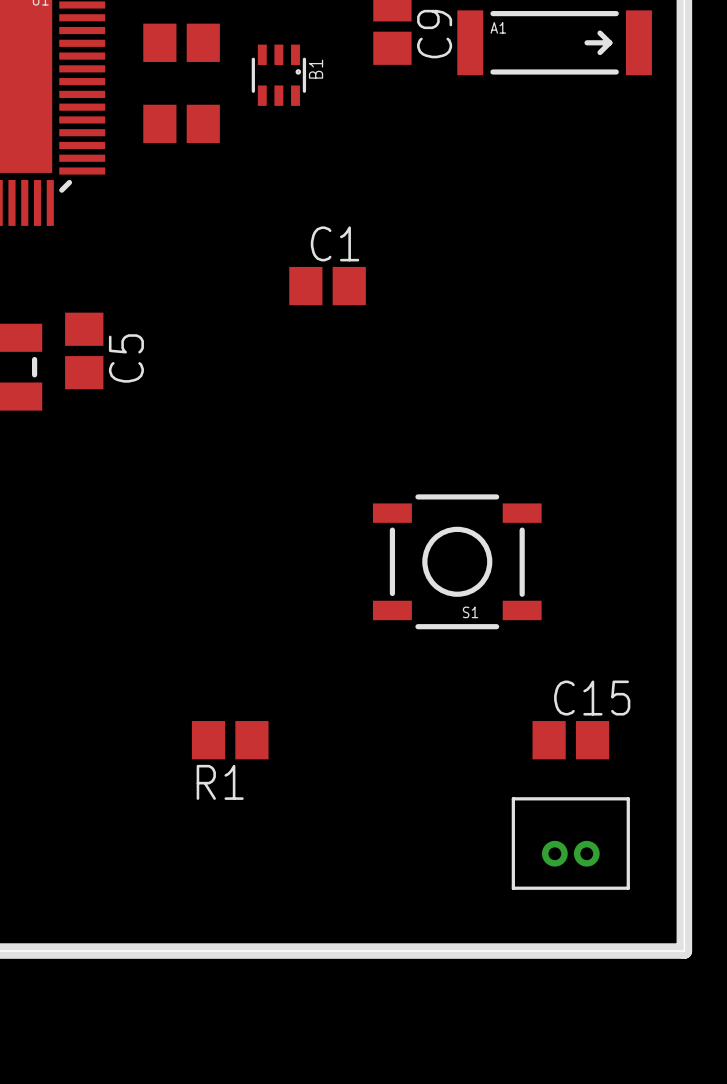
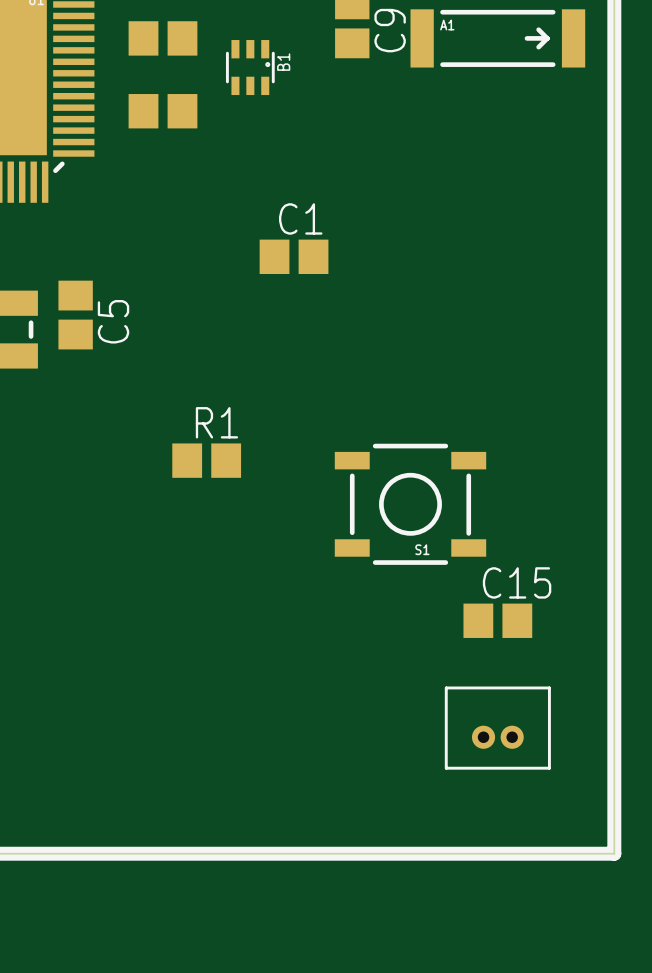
R1 position: (230, 740) -> (206, 460)
C15 position: (570, 740) -> (497, 620)
R1 name position: R1 (220, 782) -> R1 (216, 422)
part position: (570, 843) -> (497, 728)

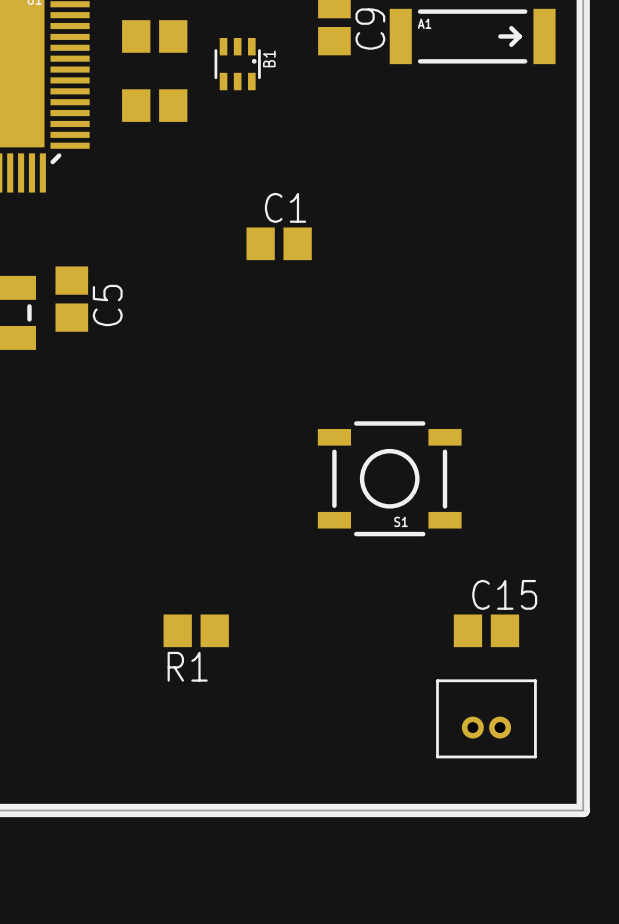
R1 name position: R1 (216, 422) -> R1 (187, 666)
R1 position: (206, 460) -> (196, 630)
C15 position: (497, 620) -> (486, 630)
part position: (497, 728) -> (486, 718)

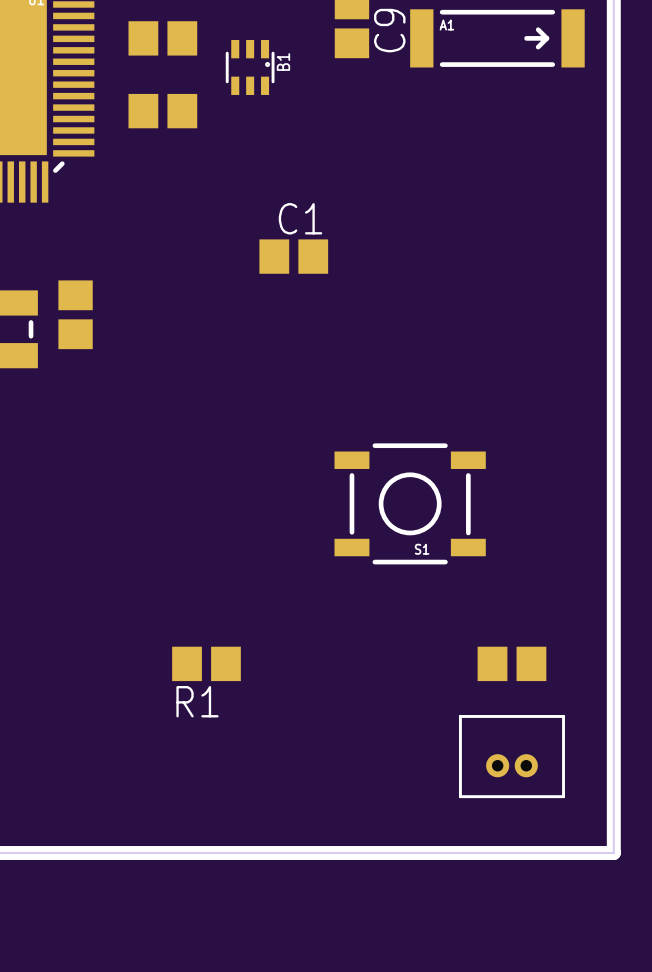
C5 name: C5 (107, 305) -> none
C15 name: C15 (504, 594) -> none

